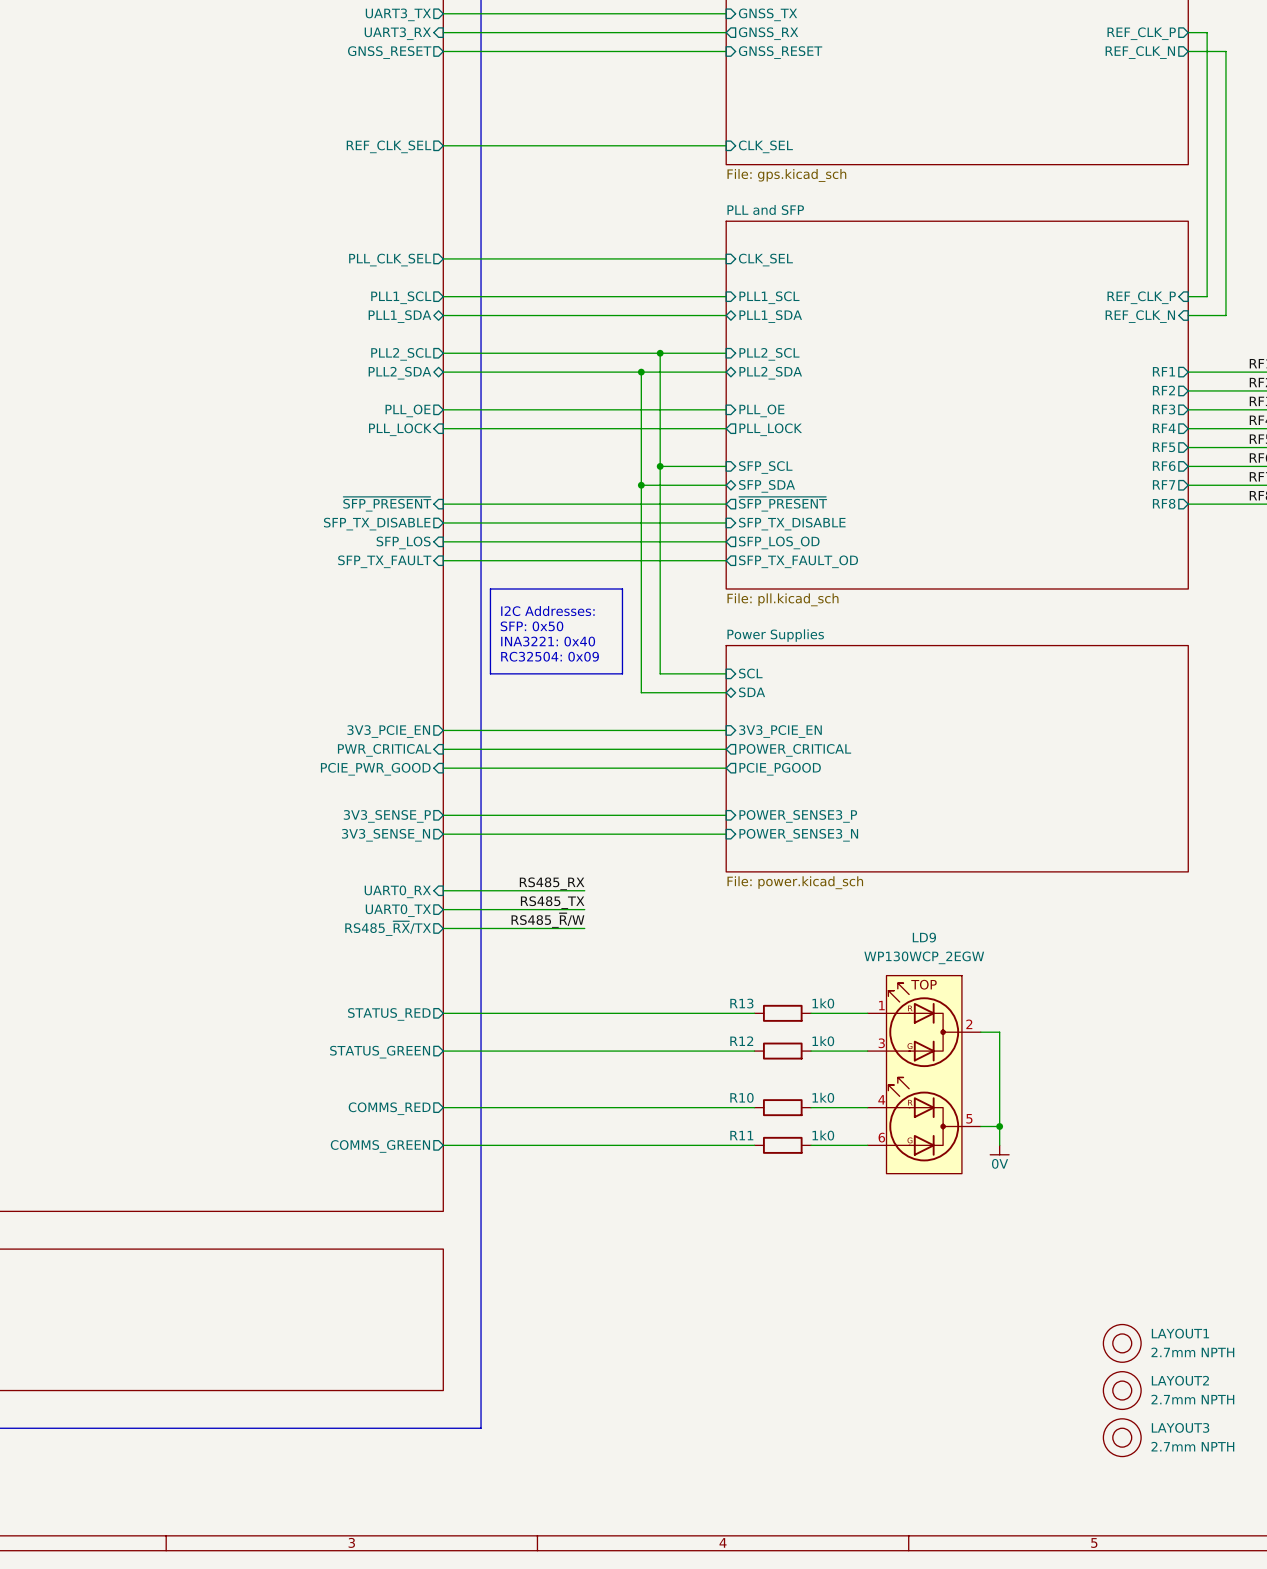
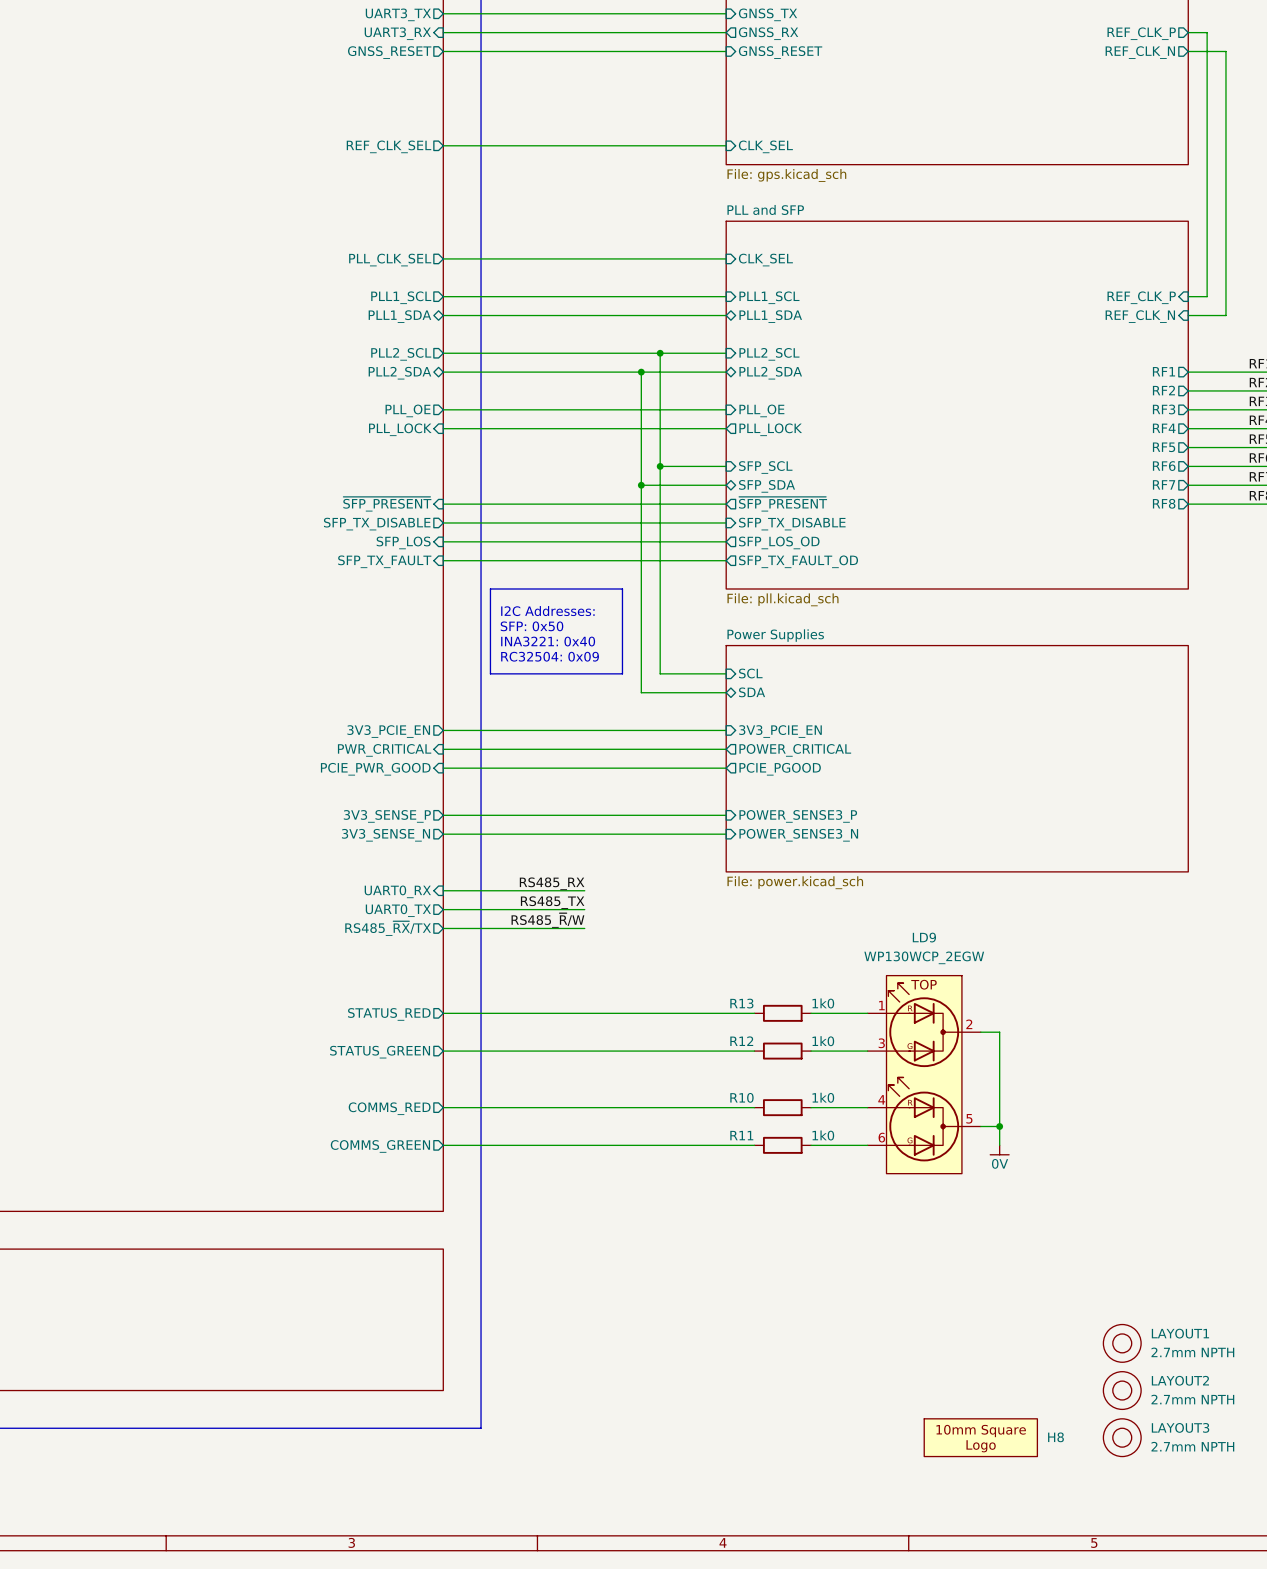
H8: none -> (980, 1437)

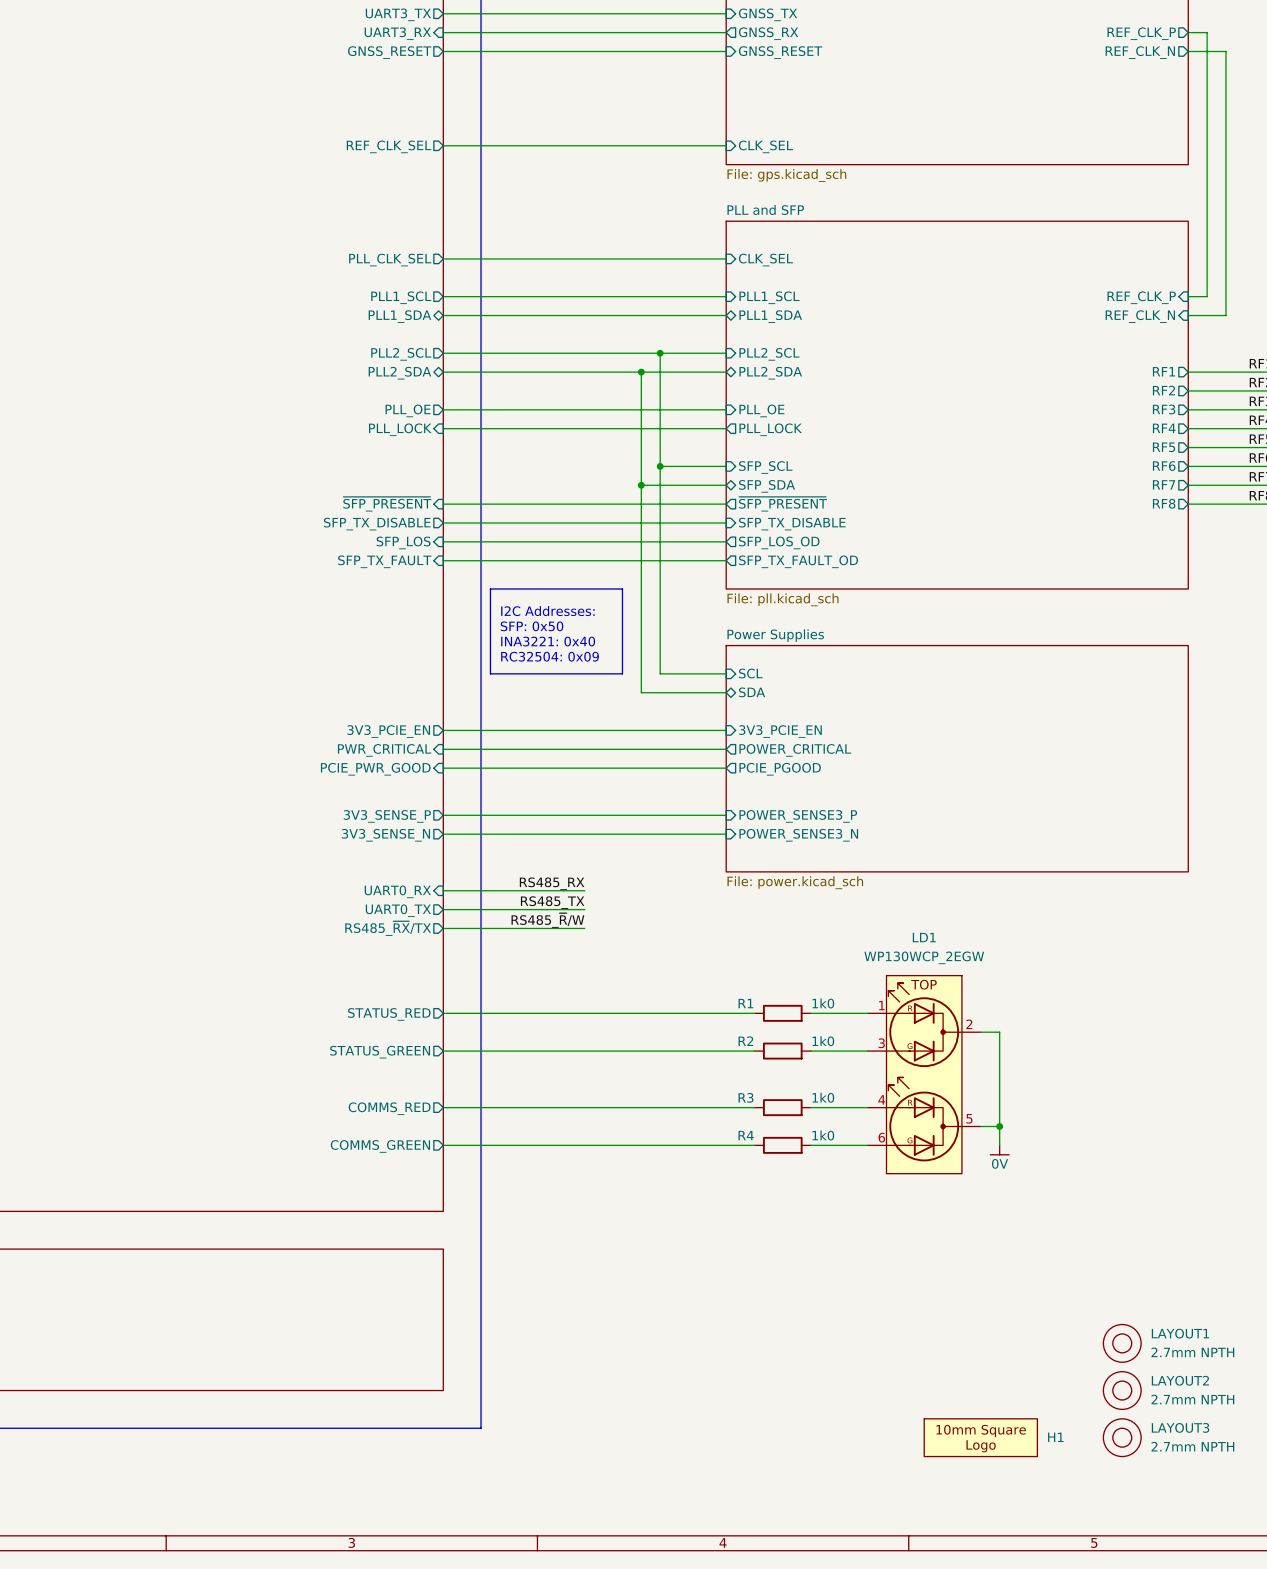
LD9 name: LD9 (924, 937) -> LD1 (924, 937)
R13 name: R13 (741, 1003) -> R1 (745, 1003)
R12 name: R12 (741, 1041) -> R2 (745, 1041)
R10 name: R10 (741, 1097) -> R3 (745, 1097)
R11 name: R11 (741, 1135) -> R4 (746, 1135)
H8 name: H8 (1055, 1437) -> H1 (1055, 1437)

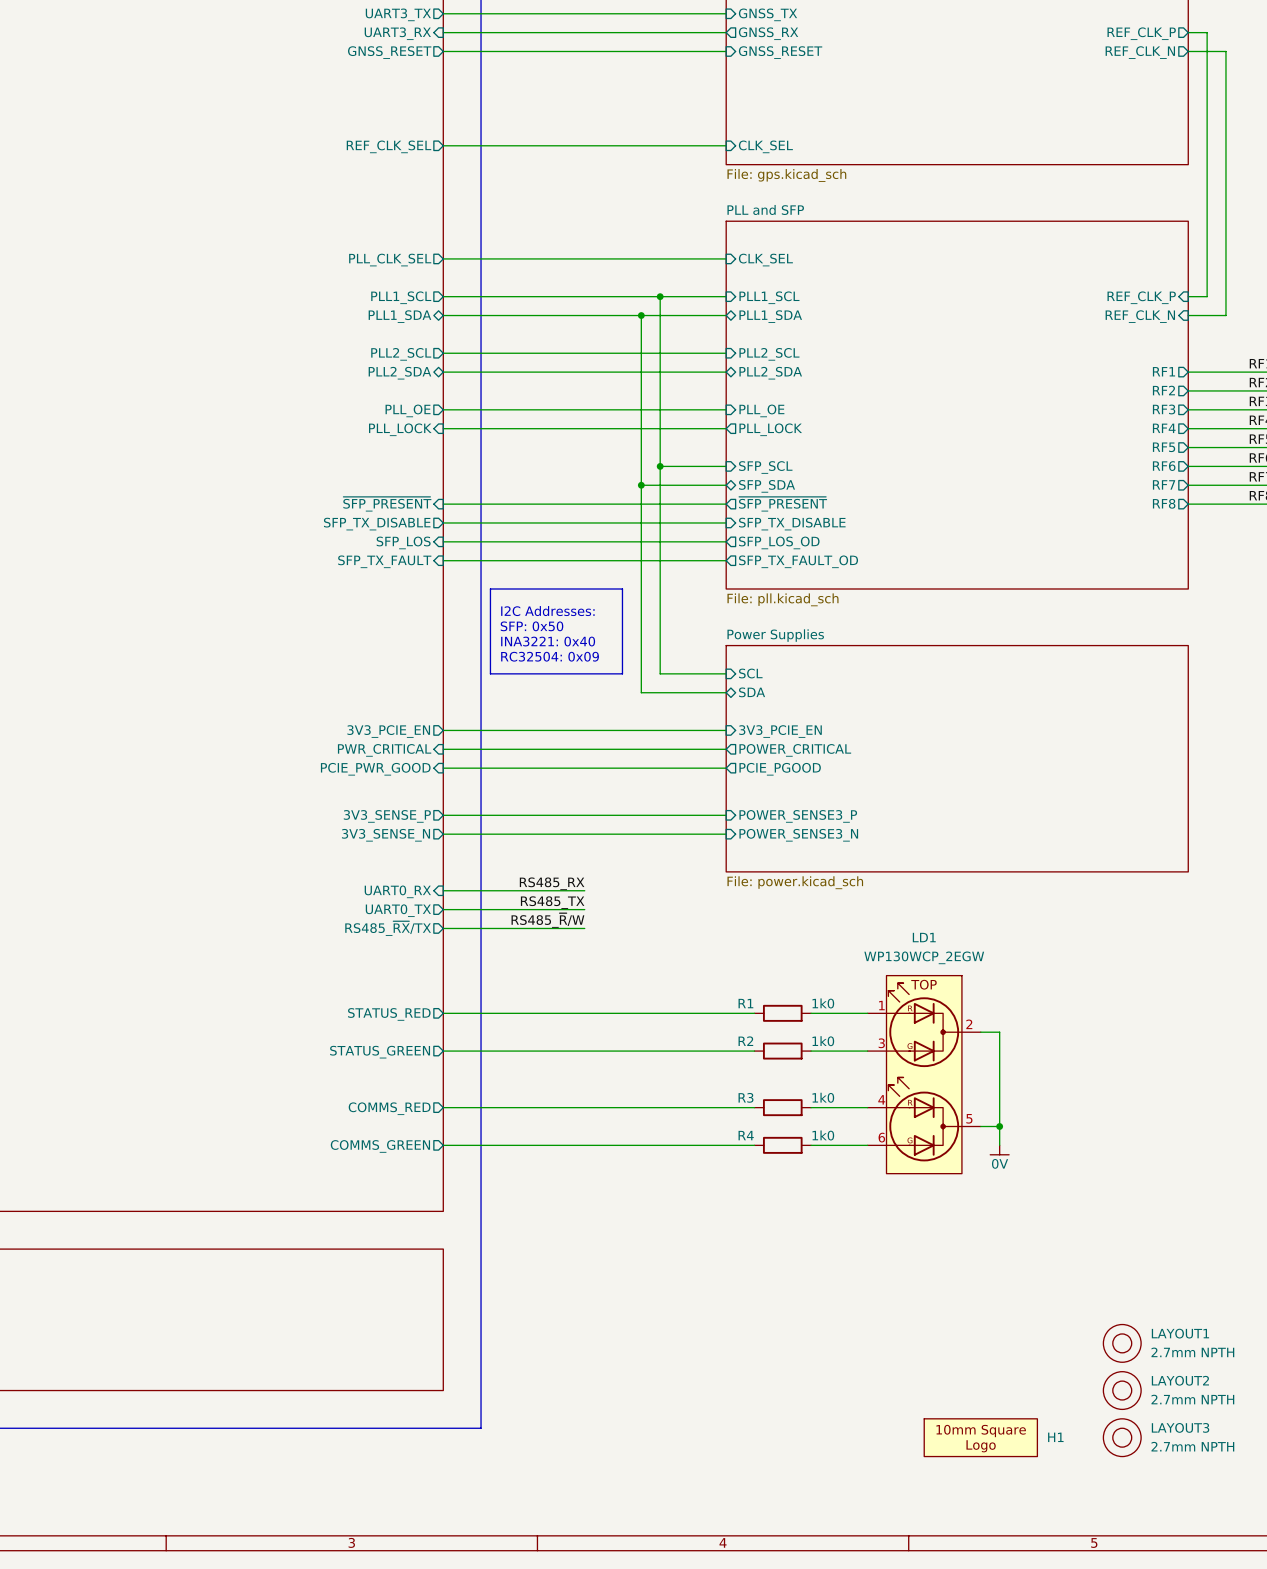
wire: none -> (660, 296) (660, 353)
junction: none -> (660, 296)
wire: none -> (641, 315) (641, 372)
junction: none -> (641, 315)
junction: (660, 353) -> none
junction: (641, 372) -> none

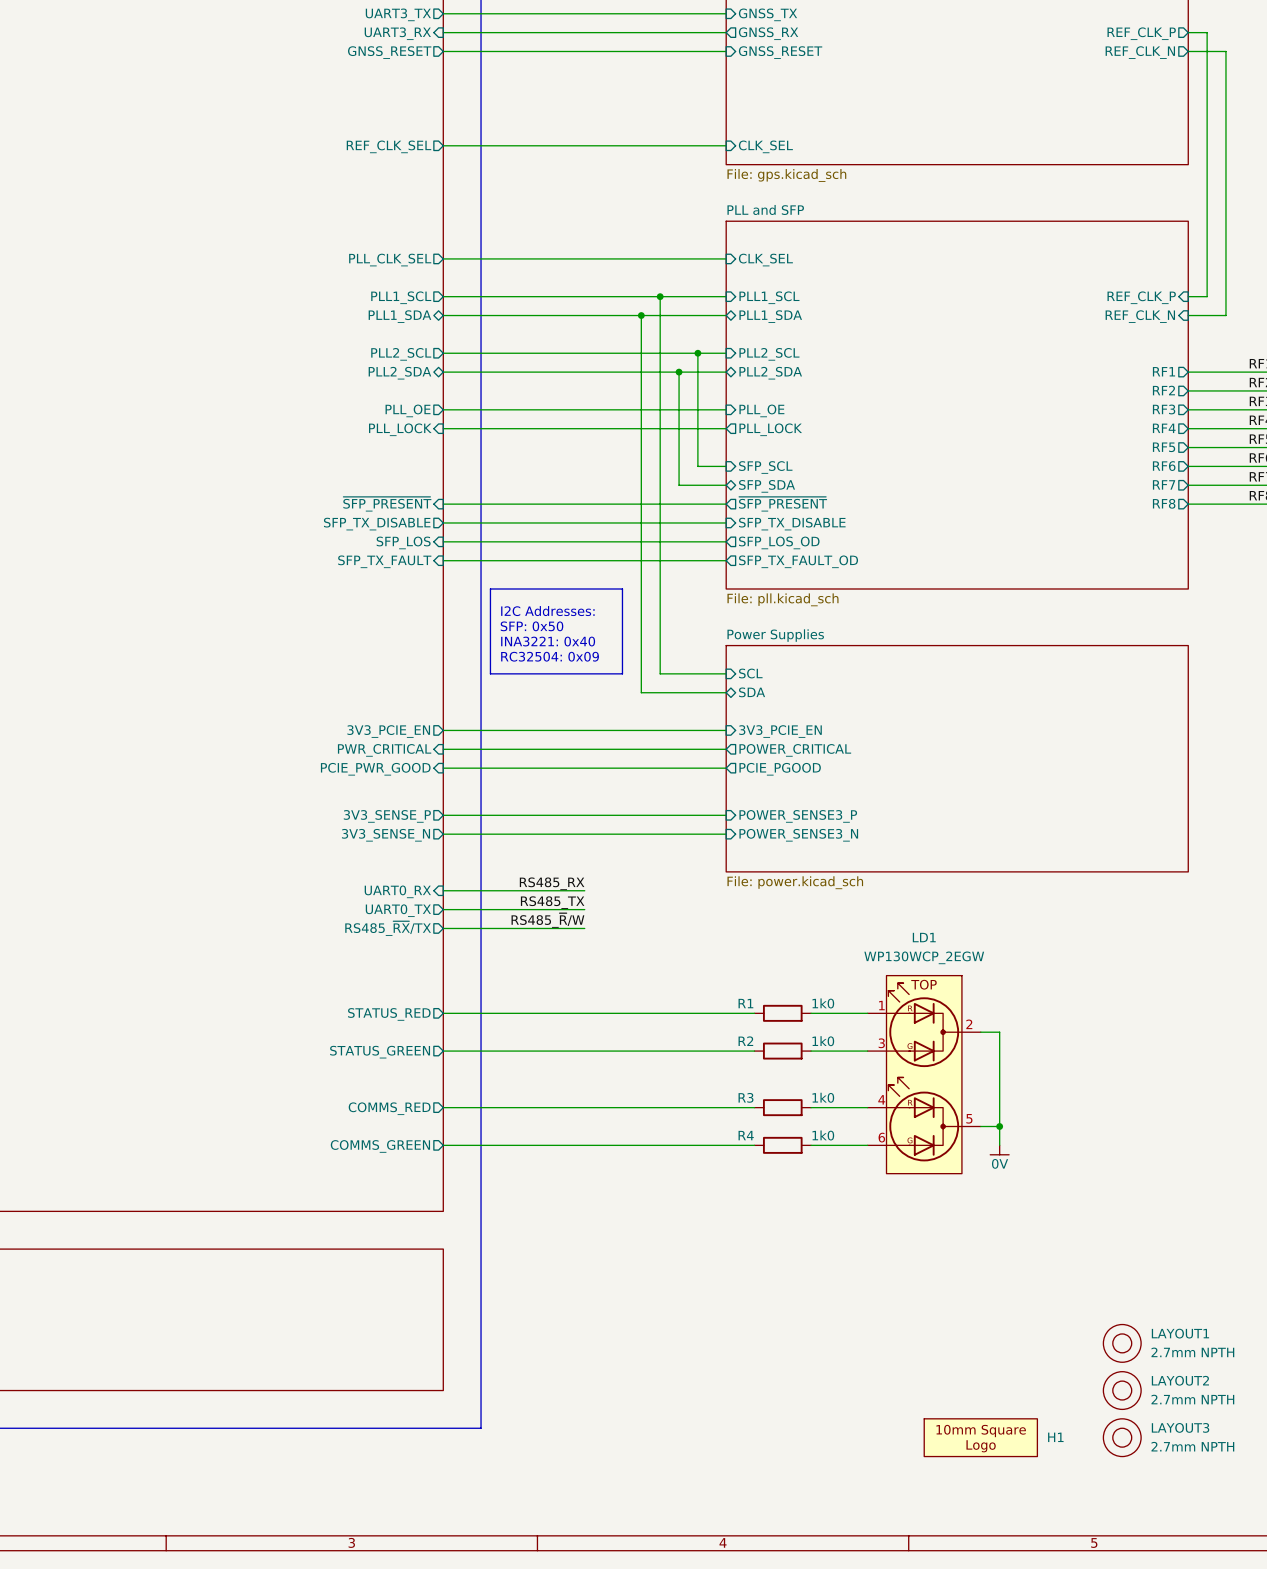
junction: none -> (697, 353)
junction: none -> (679, 372)
wire: (660, 466) (697, 466) -> (697, 353) (697, 466)
junction: (660, 466) -> none
wire: (641, 485) (679, 485) -> (679, 372) (679, 485)
junction: (641, 485) -> none

